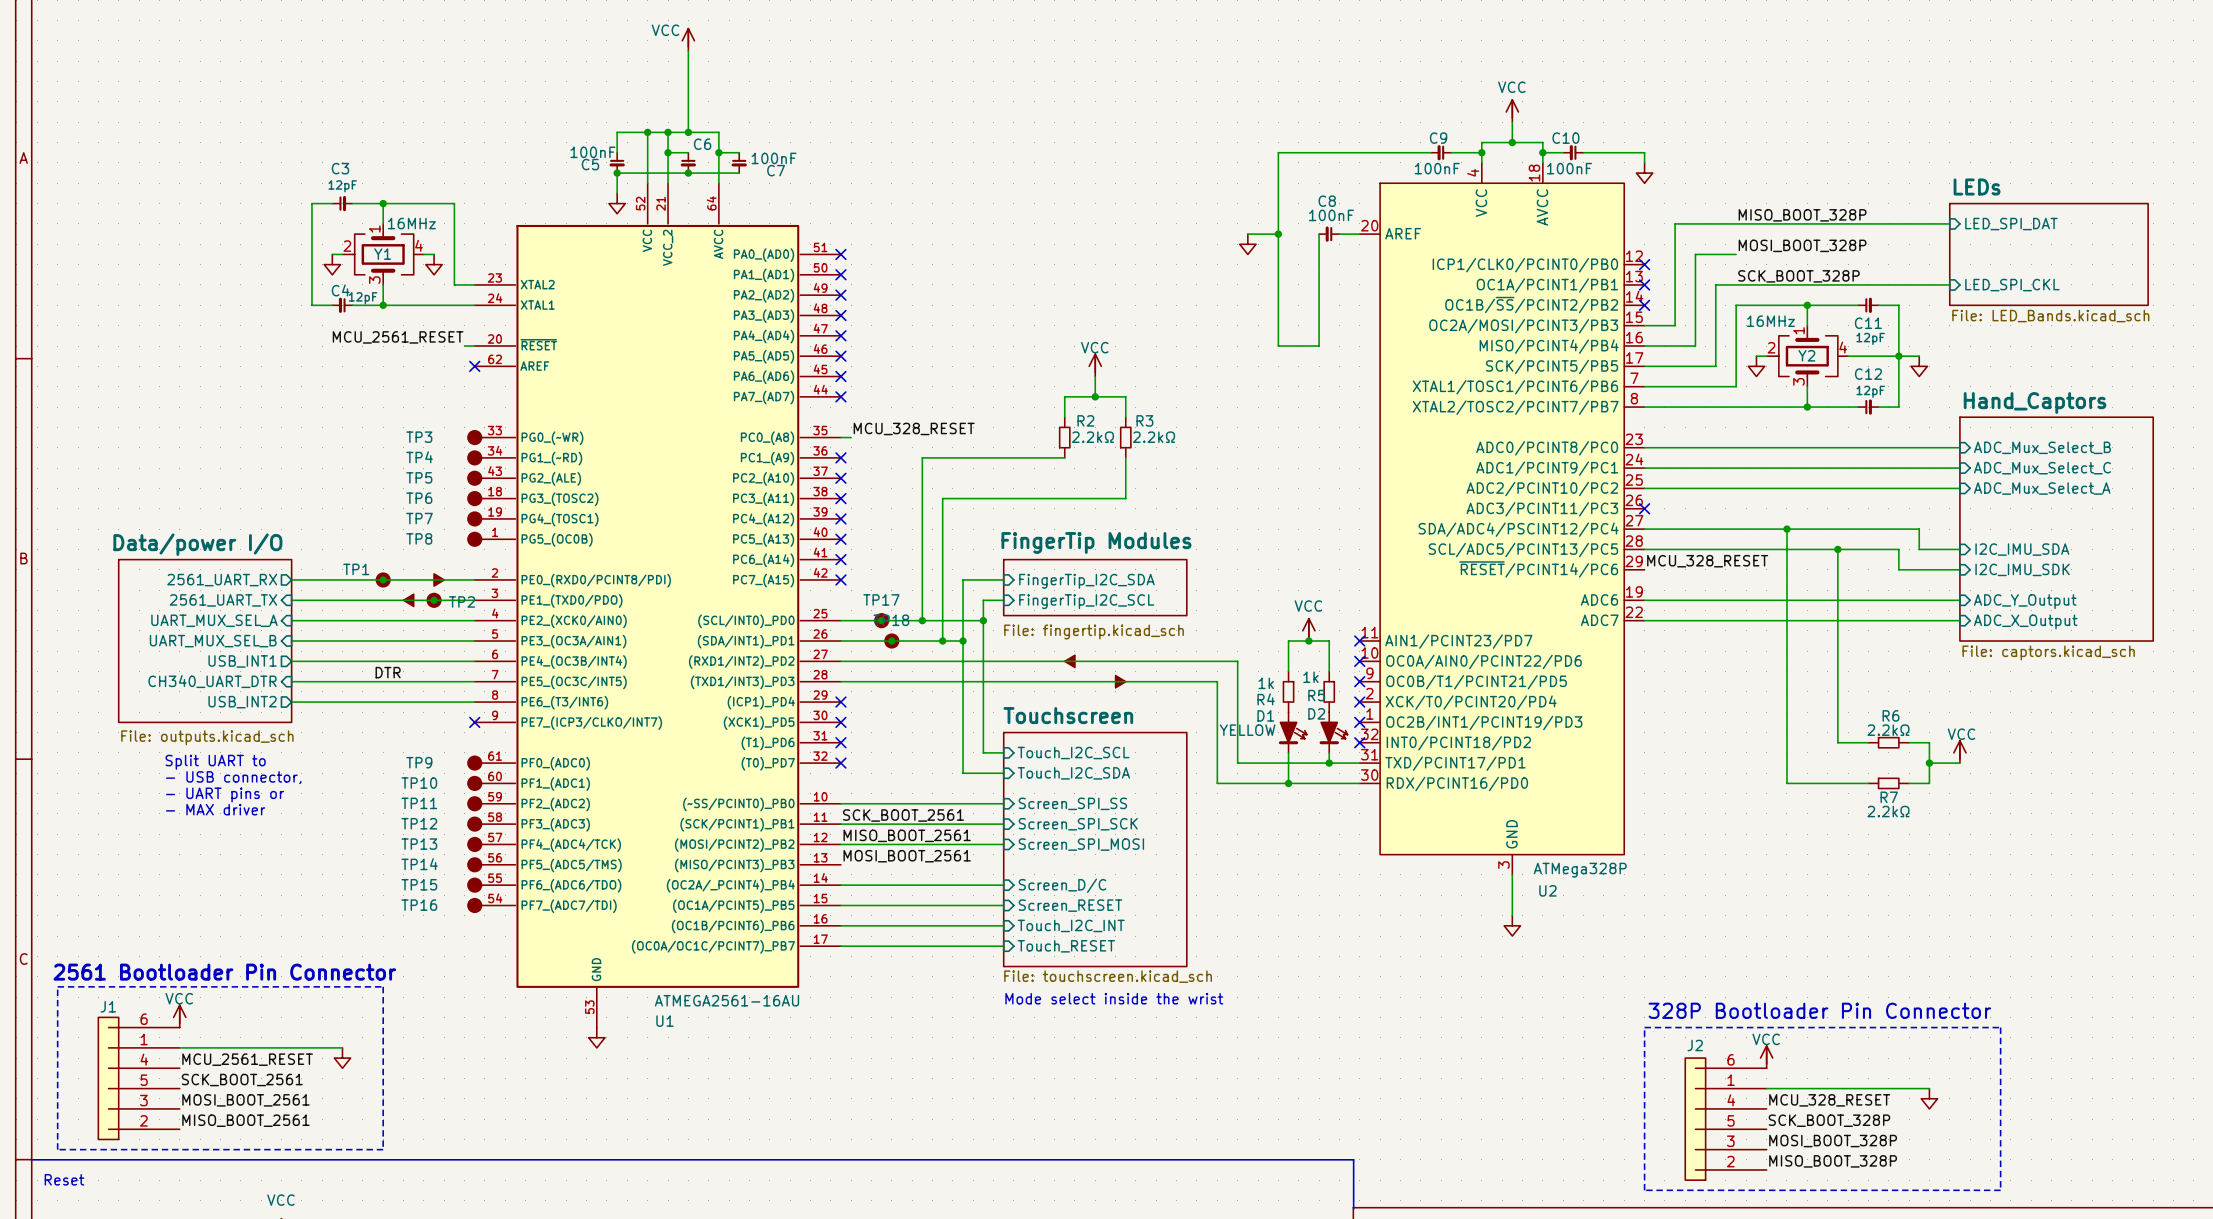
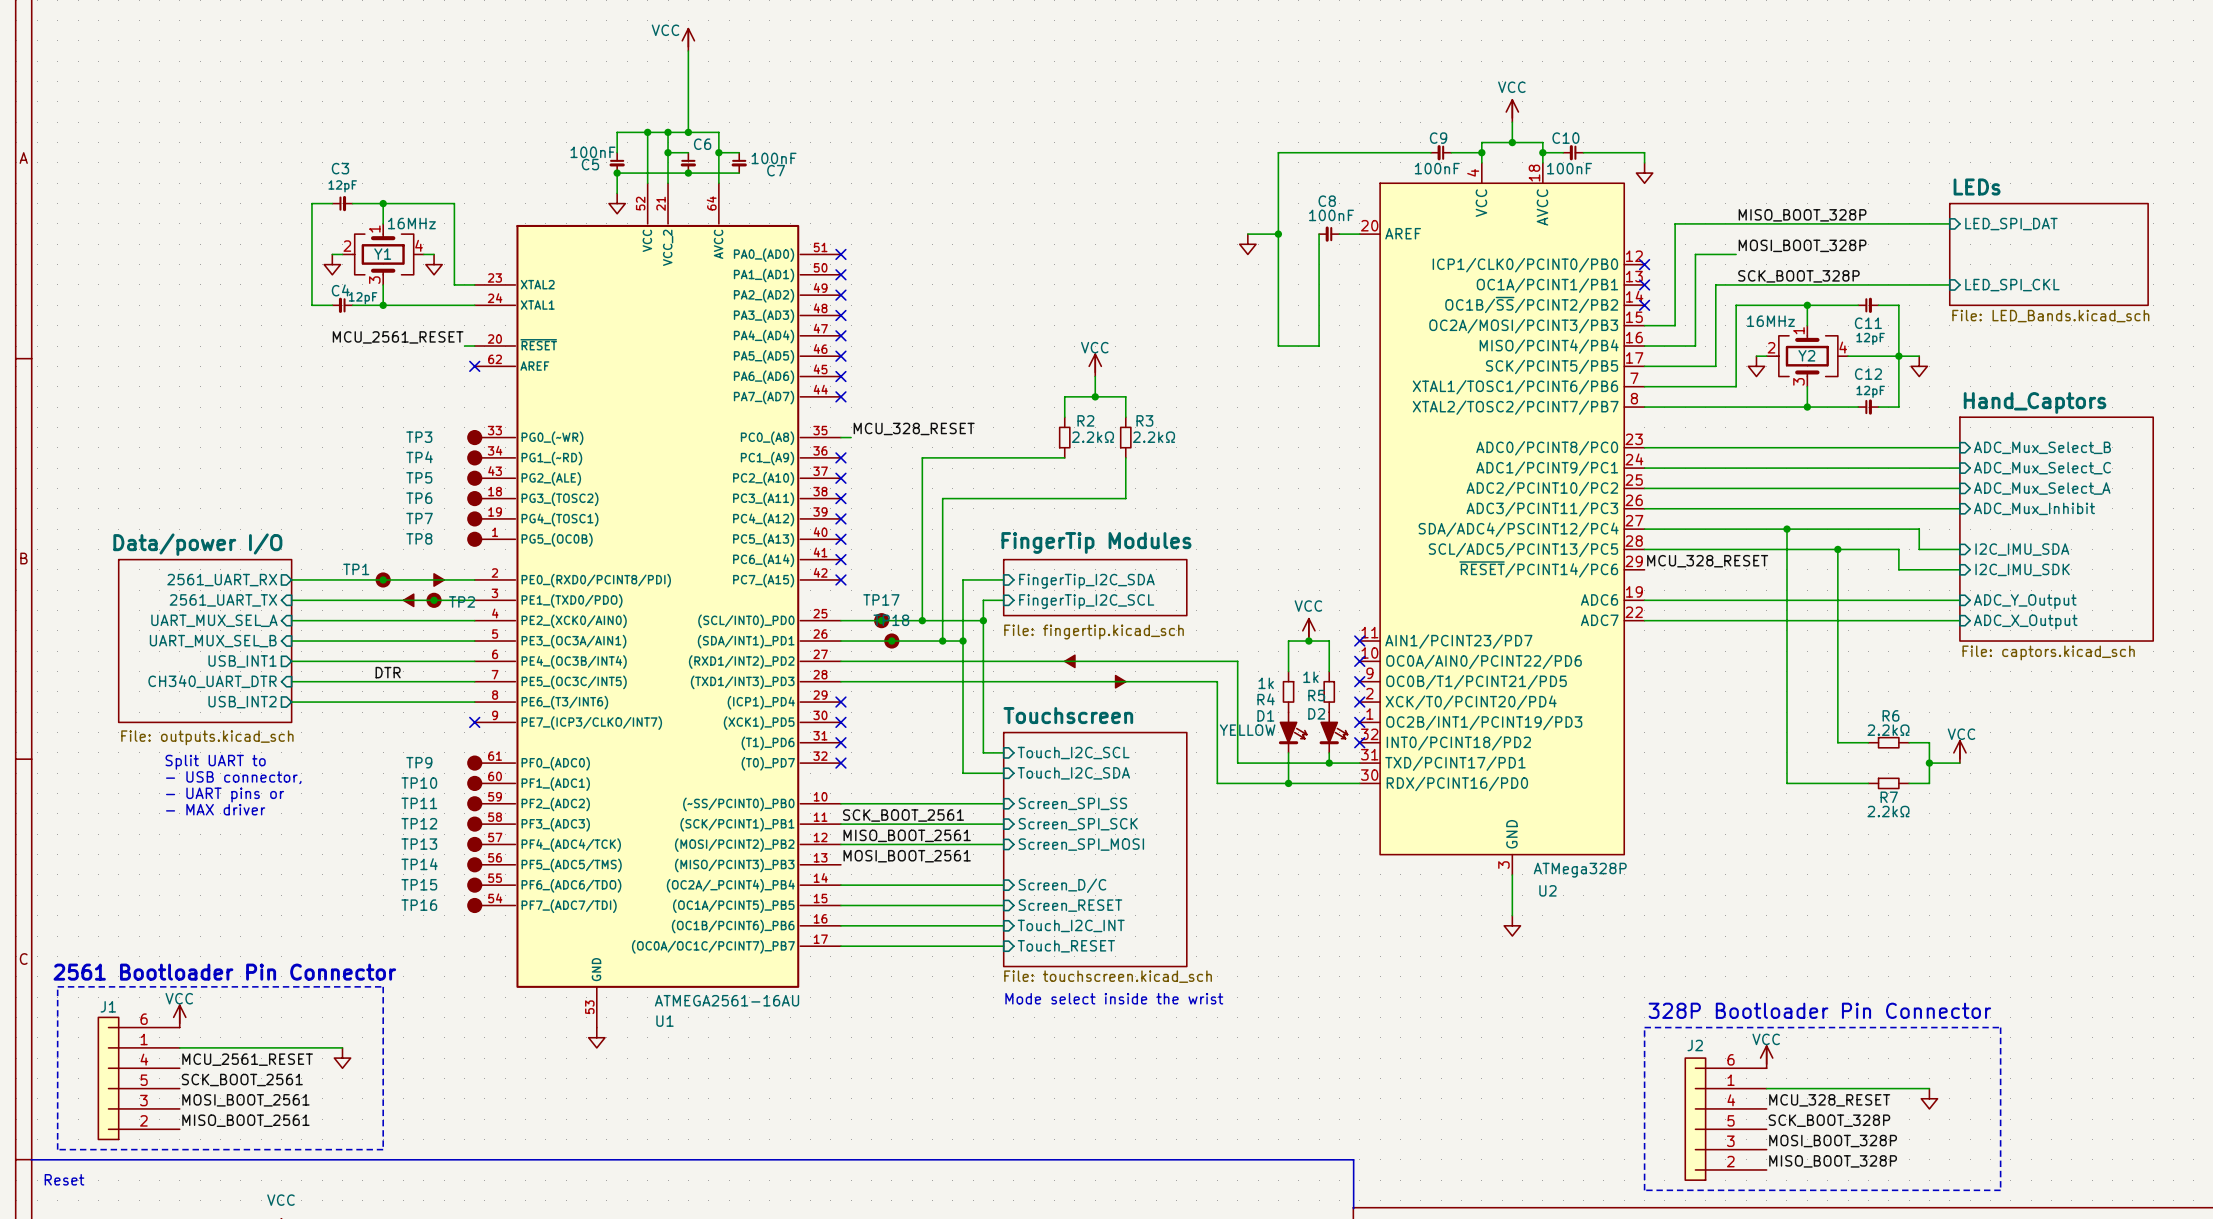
wire: none -> (1644, 508) (1959, 508)
no-connect mark: (1644, 508) -> none
sheet pin: none -> ADC_Mux_Inhibit (2034, 508)

